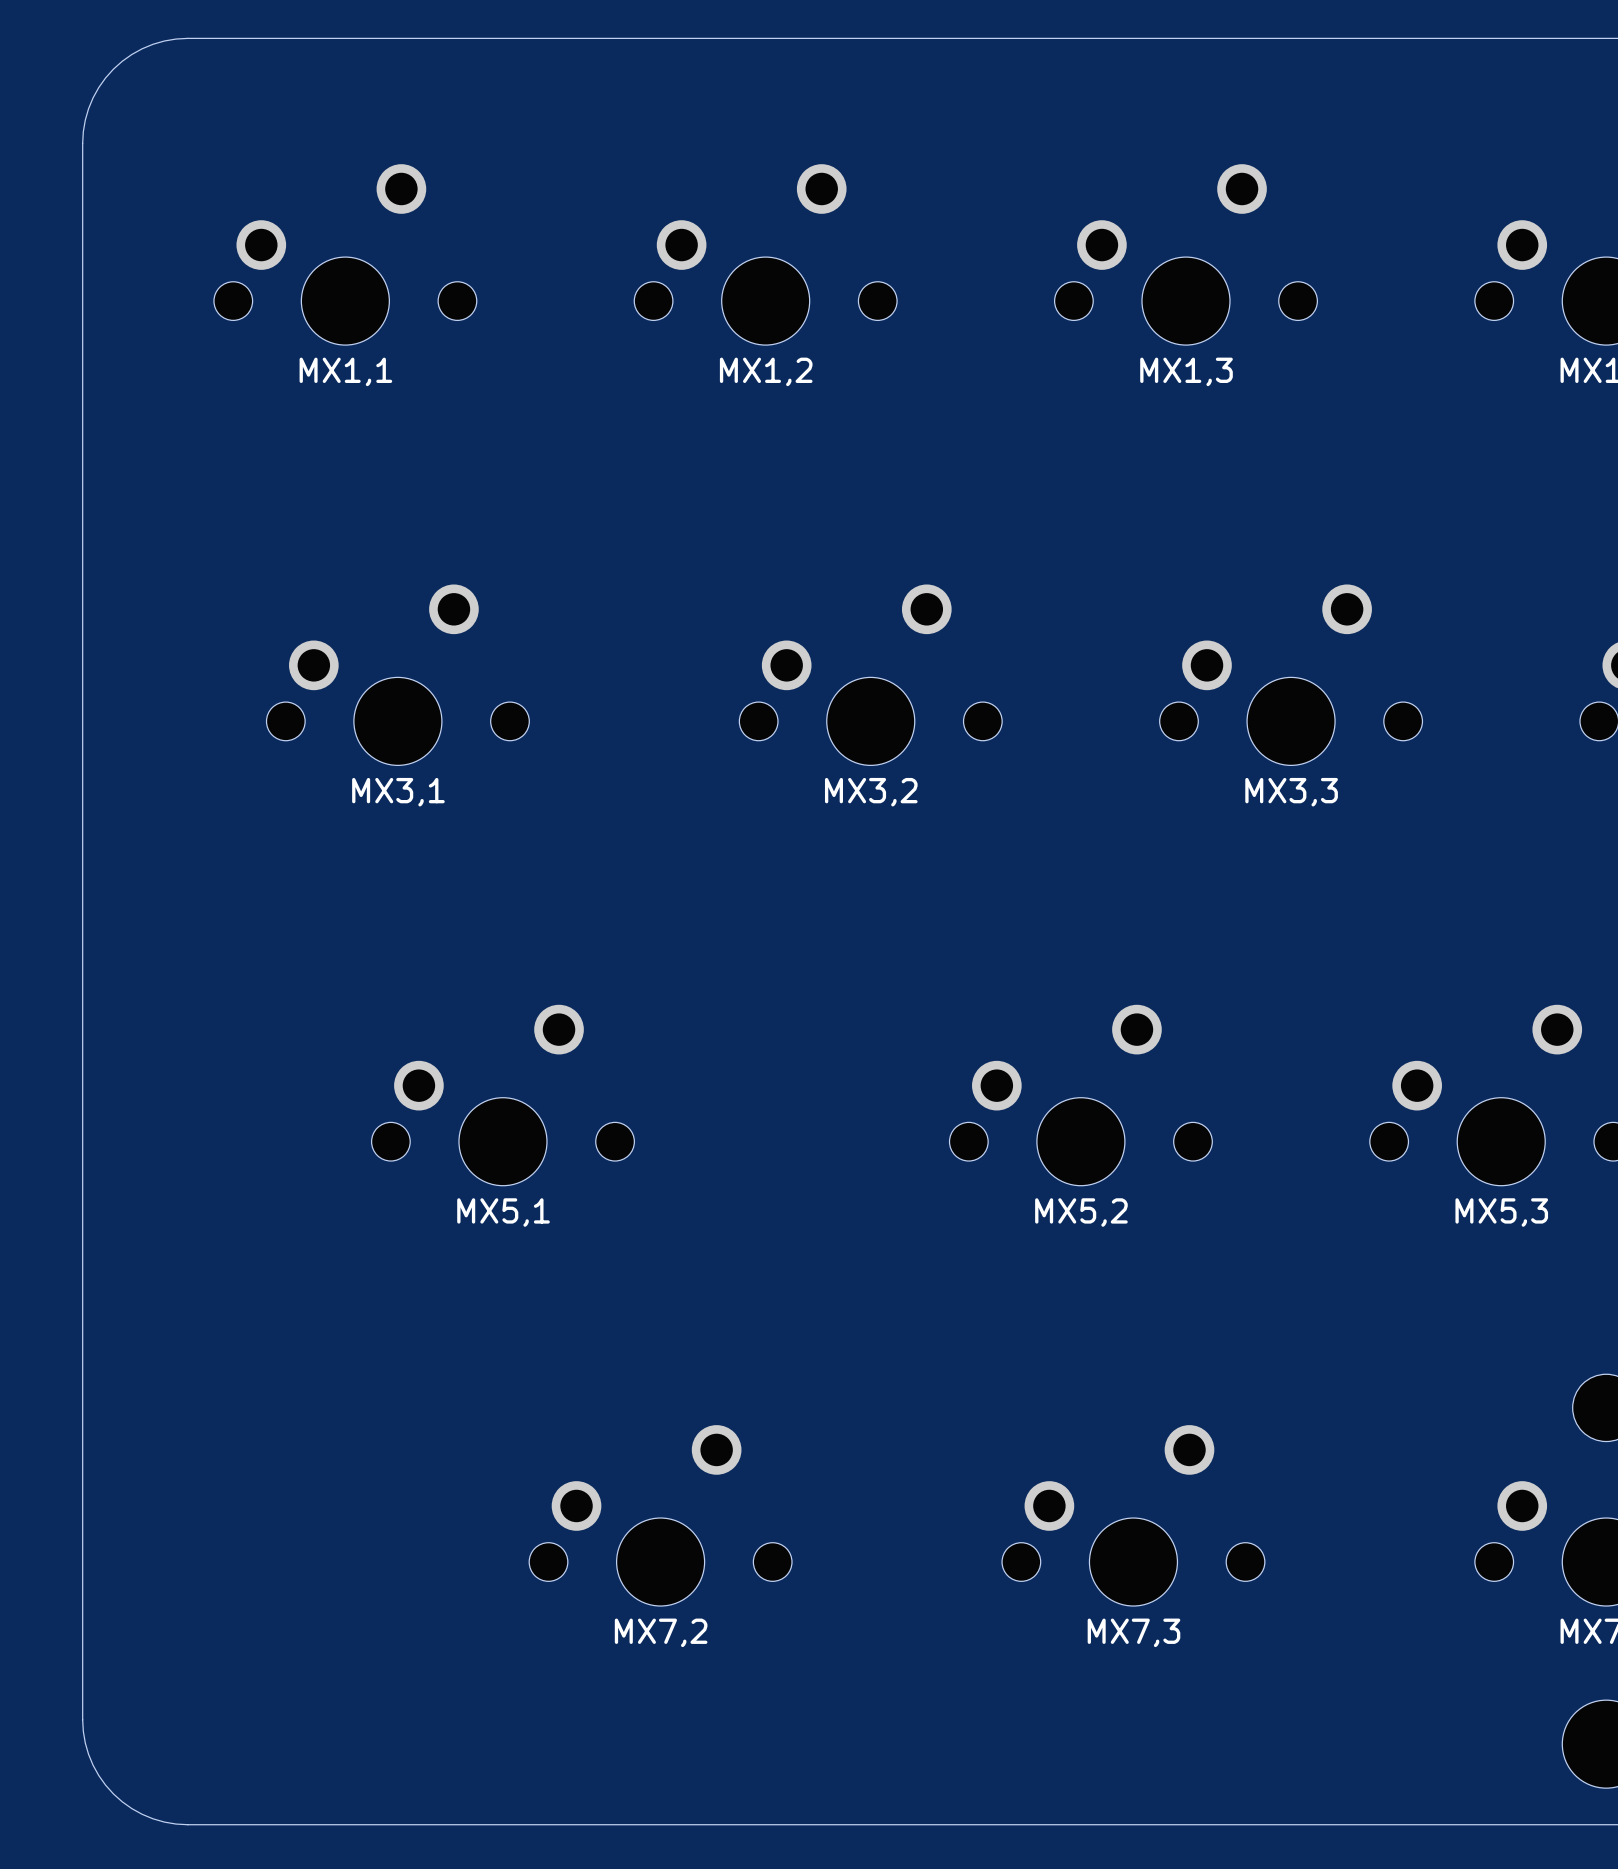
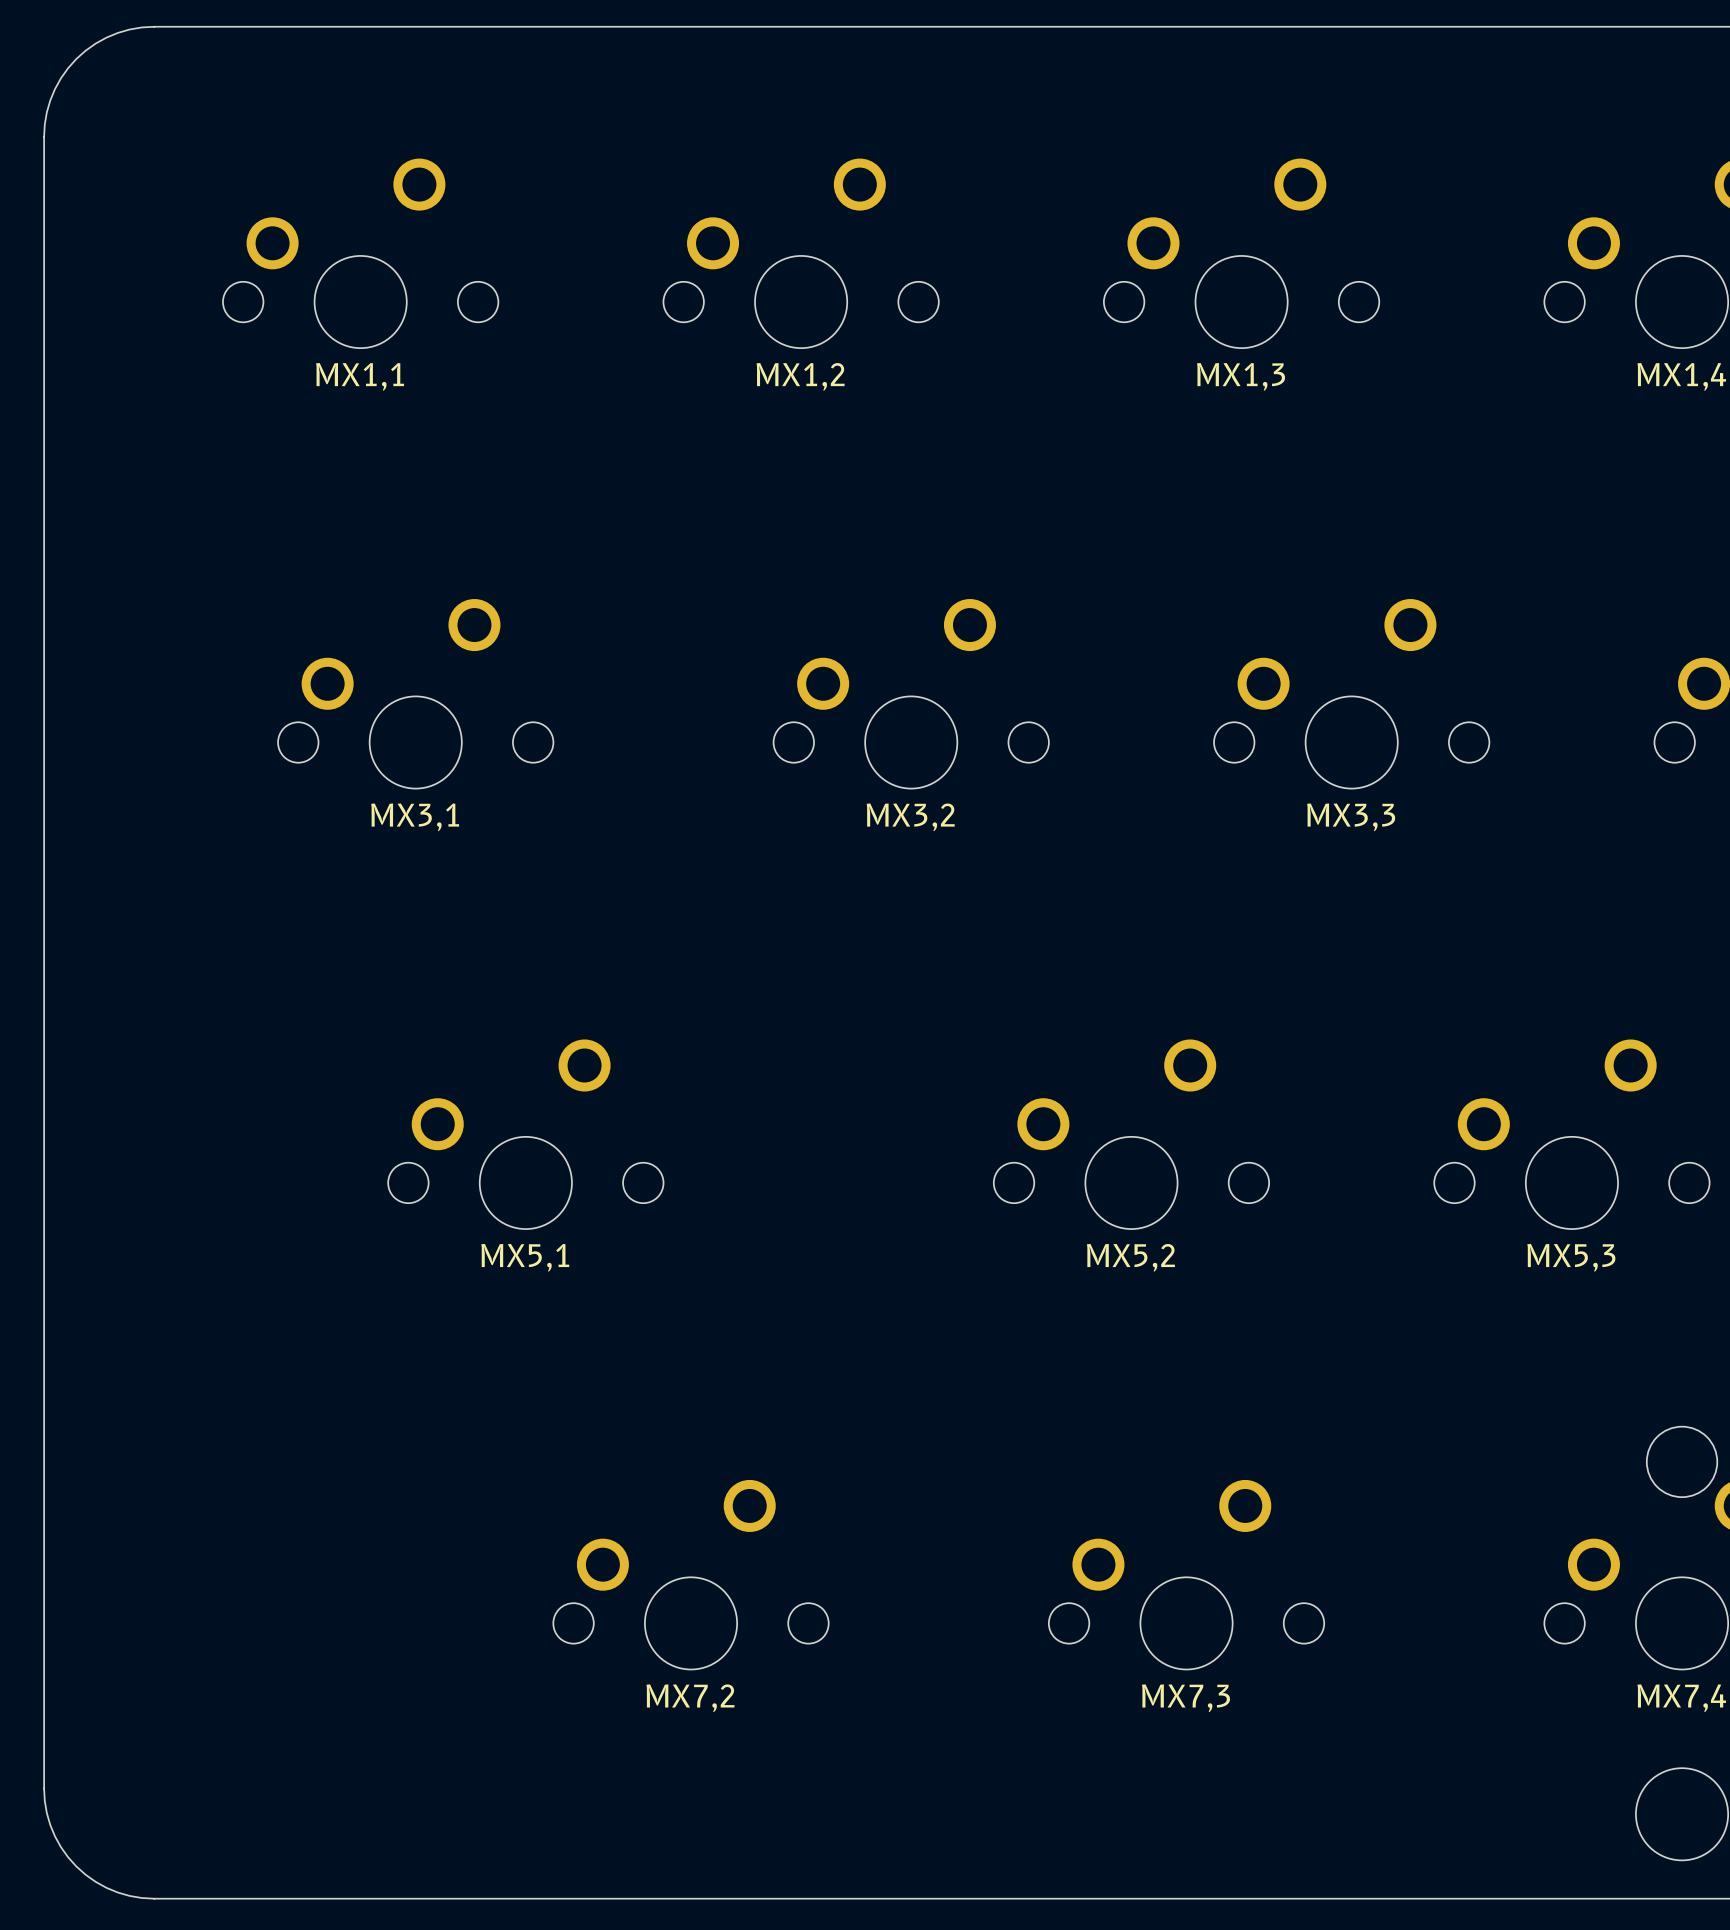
board edge: (187, 38) (164, 41) (142, 48) (113, 69) (98, 87) (88, 108) (82, 143) (83, 1731) (93, 1765) (113, 1793) (131, 1808) (153, 1818) (187, 1824) -> (195, 26) (154, 26) (129, 29) (106, 37) (85, 50) (68, 68) (55, 89) (46, 112) (44, 136) (44, 1800) (50, 1824) (60, 1847) (76, 1866) (95, 1881) (117, 1892) (141, 1898) (195, 1898)

